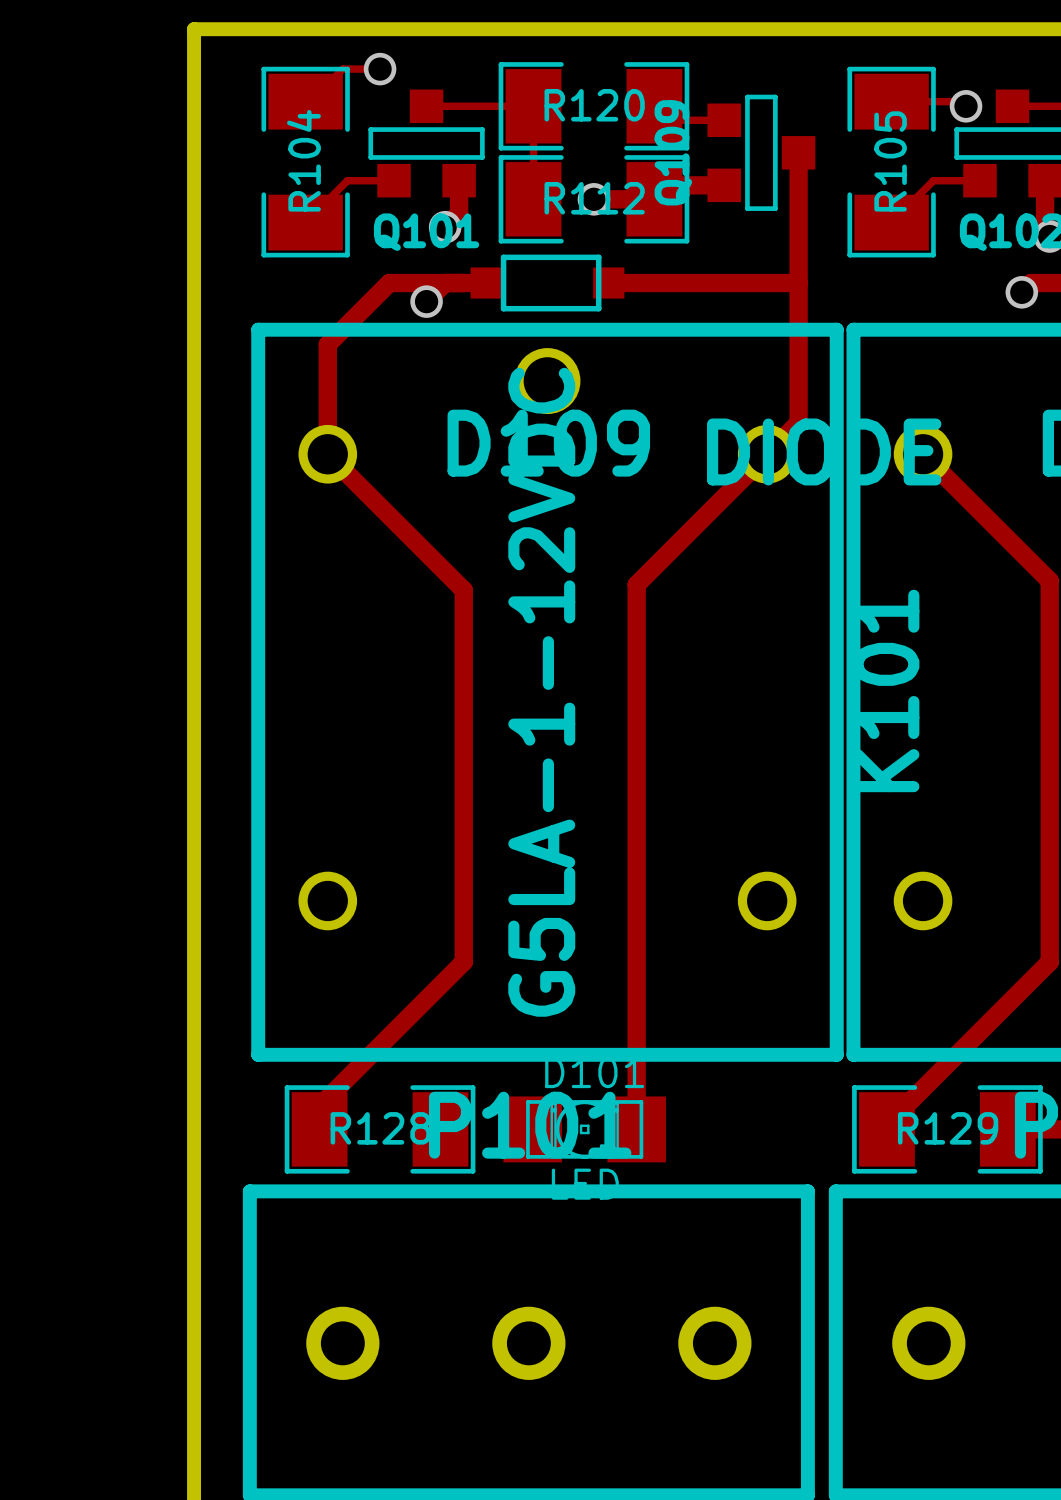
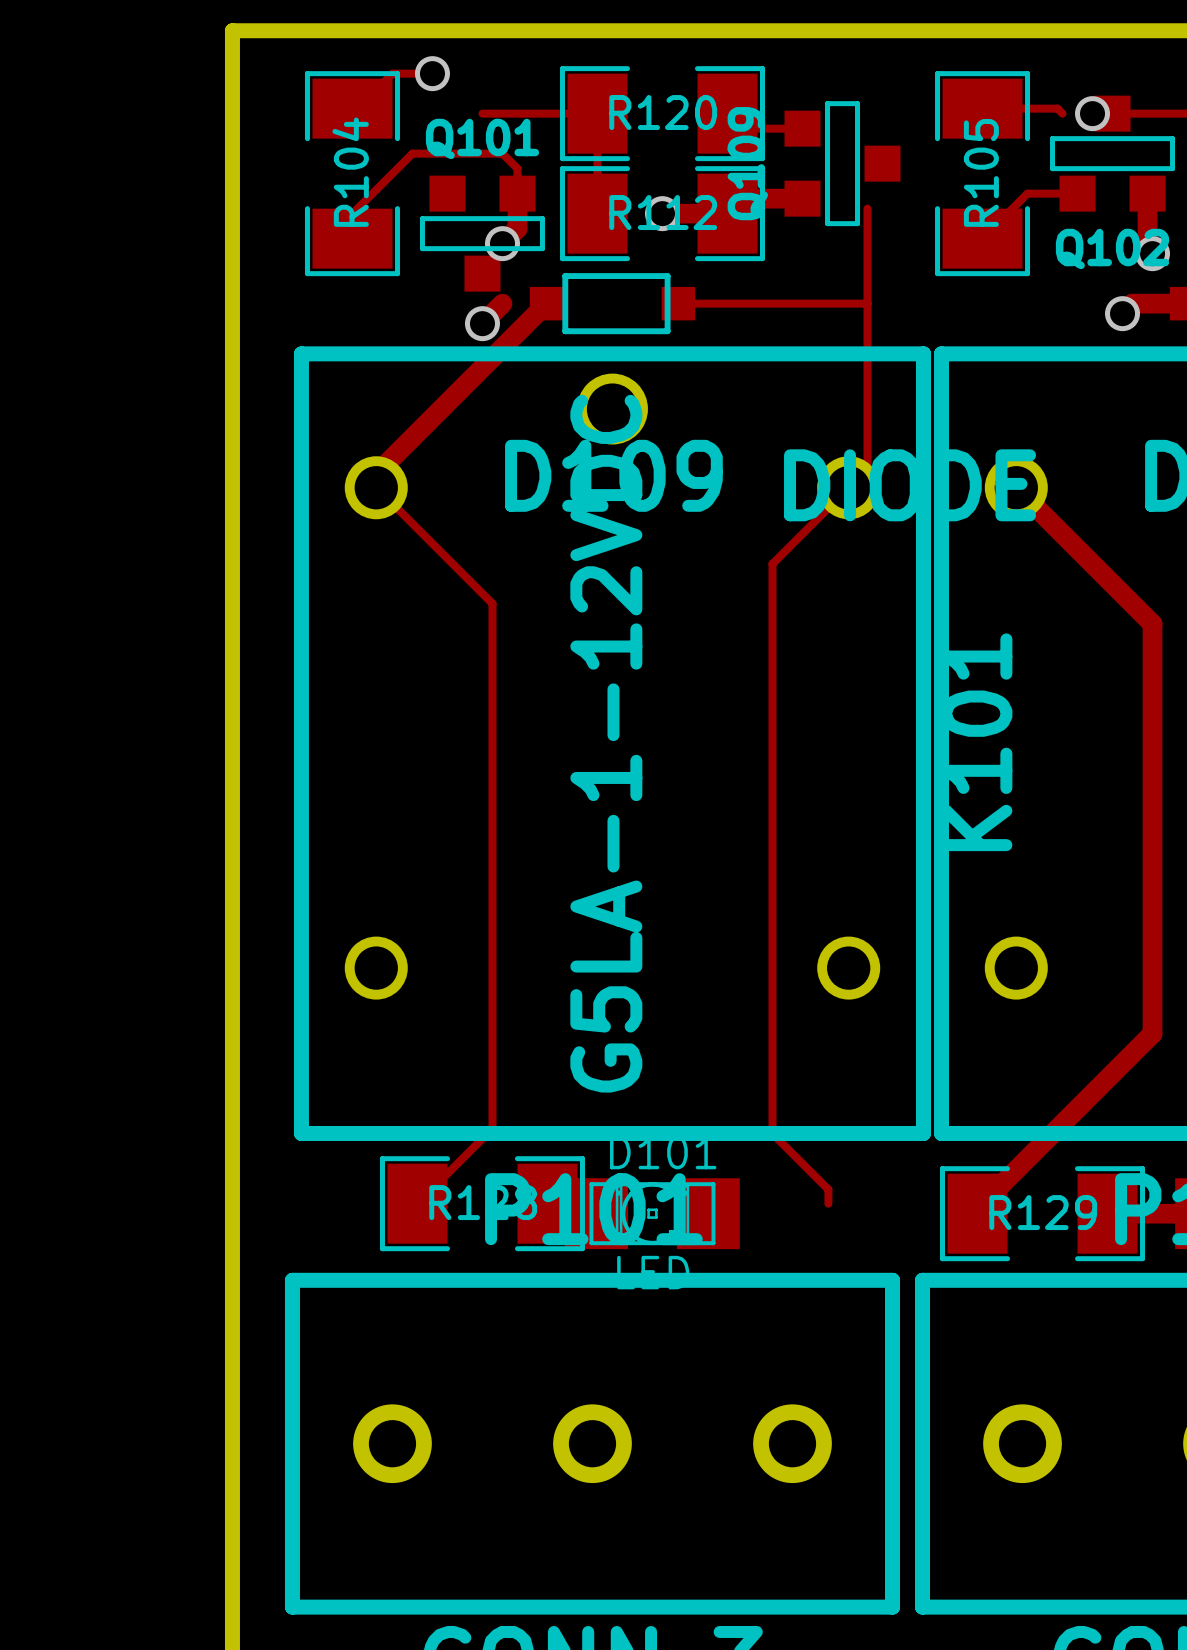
via position: (966, 106) -> (1092, 113)
Q101 rotation: 0° (426, 143) -> 180° (482, 233)
Q101 position: (426, 143) -> (482, 233)
track: (798, 152) (798, 422) (784, 436) -> (867, 208) (867, 468)
track: (394, 180) (347, 180) (305, 222) -> (517, 193) (517, 168) (502, 153) (412, 153) (352, 213) (352, 238)
track: (486, 283) (389, 283) (327, 344) (327, 441) -> (546, 303) (376, 473)
track width: thick (608, 283) (784, 283) -> thin (678, 303) (867, 303)
track width: thick (784, 436) (696, 525) -> thin (867, 468) (772, 563)
track: (327, 454) (463, 590) (463, 961) (319, 1106) (319, 1129) -> (376, 487) (492, 603) (492, 1128) (417, 1203)
track: (696, 525) (636, 584) (636, 1129) -> (772, 563) (772, 1133) (828, 1189) (828, 1203)
R128 position: (380, 1129) -> (482, 1203)

